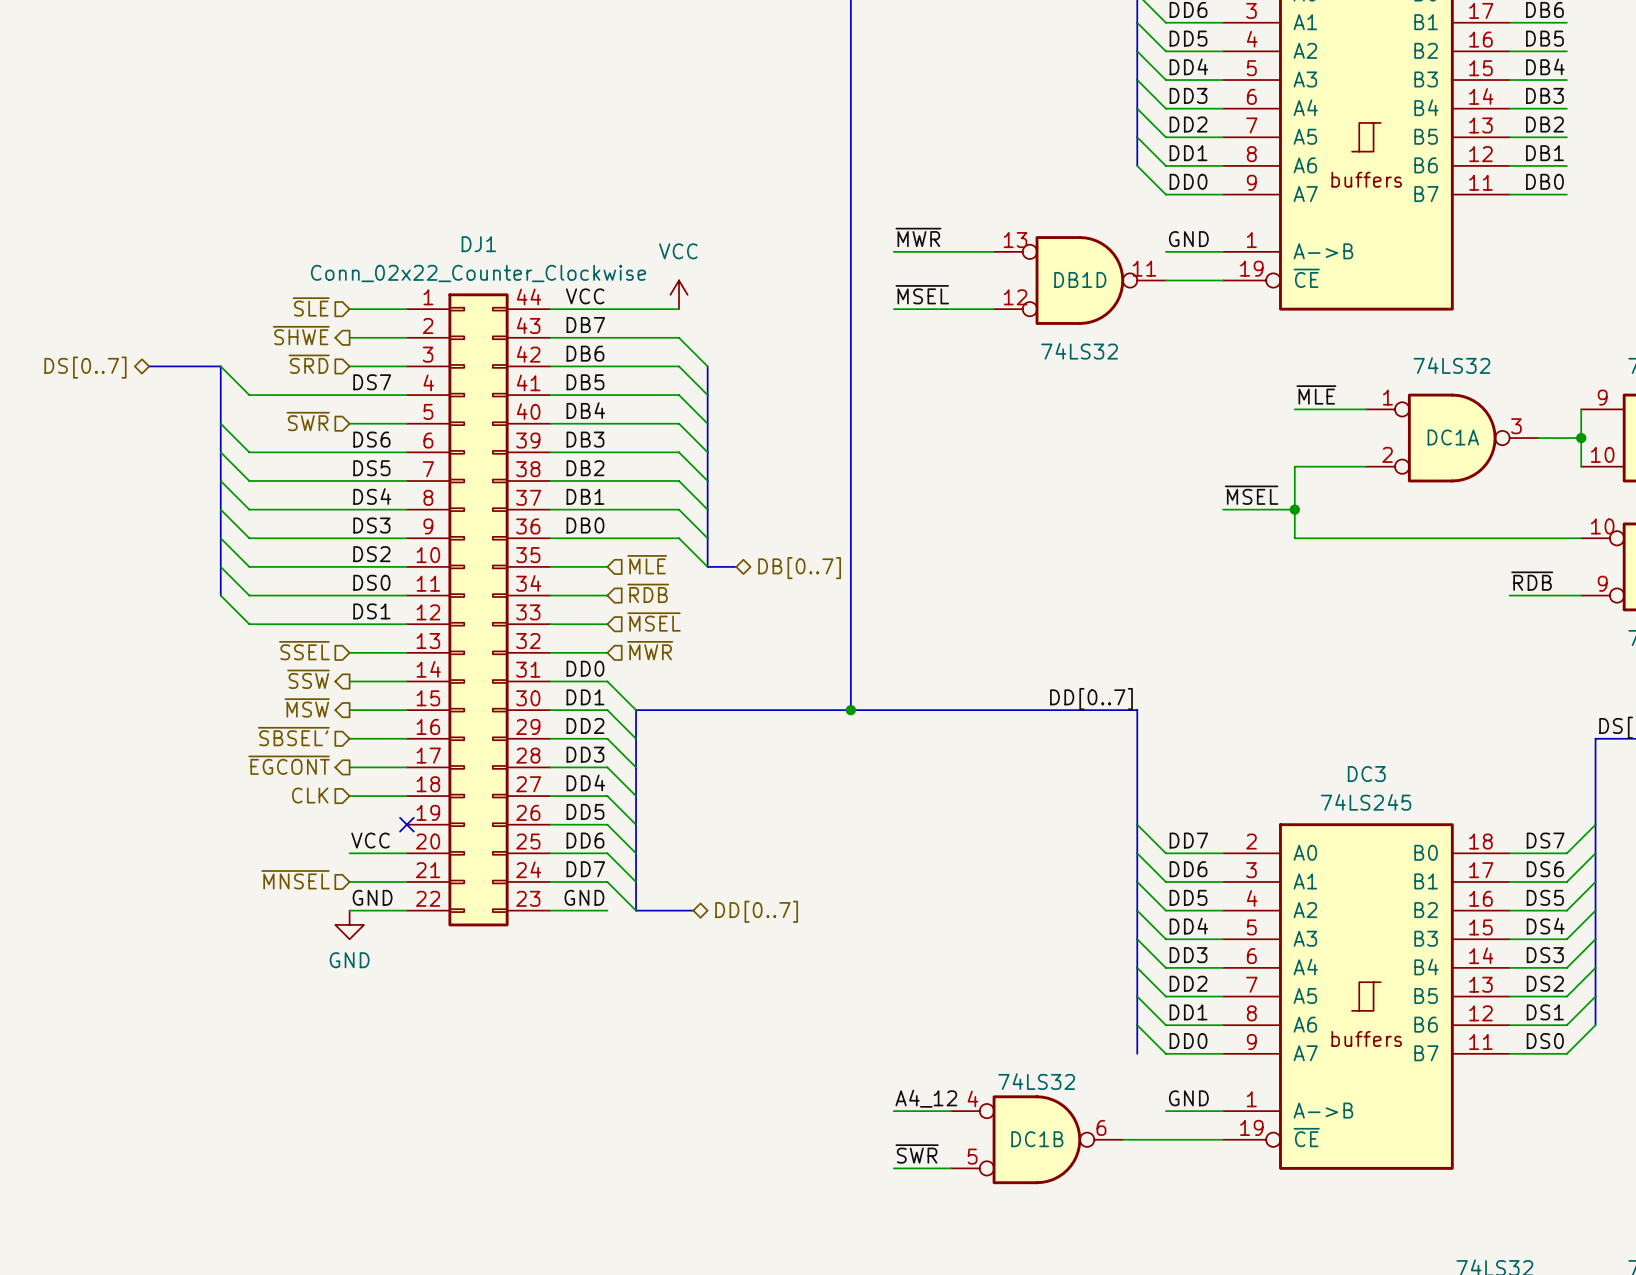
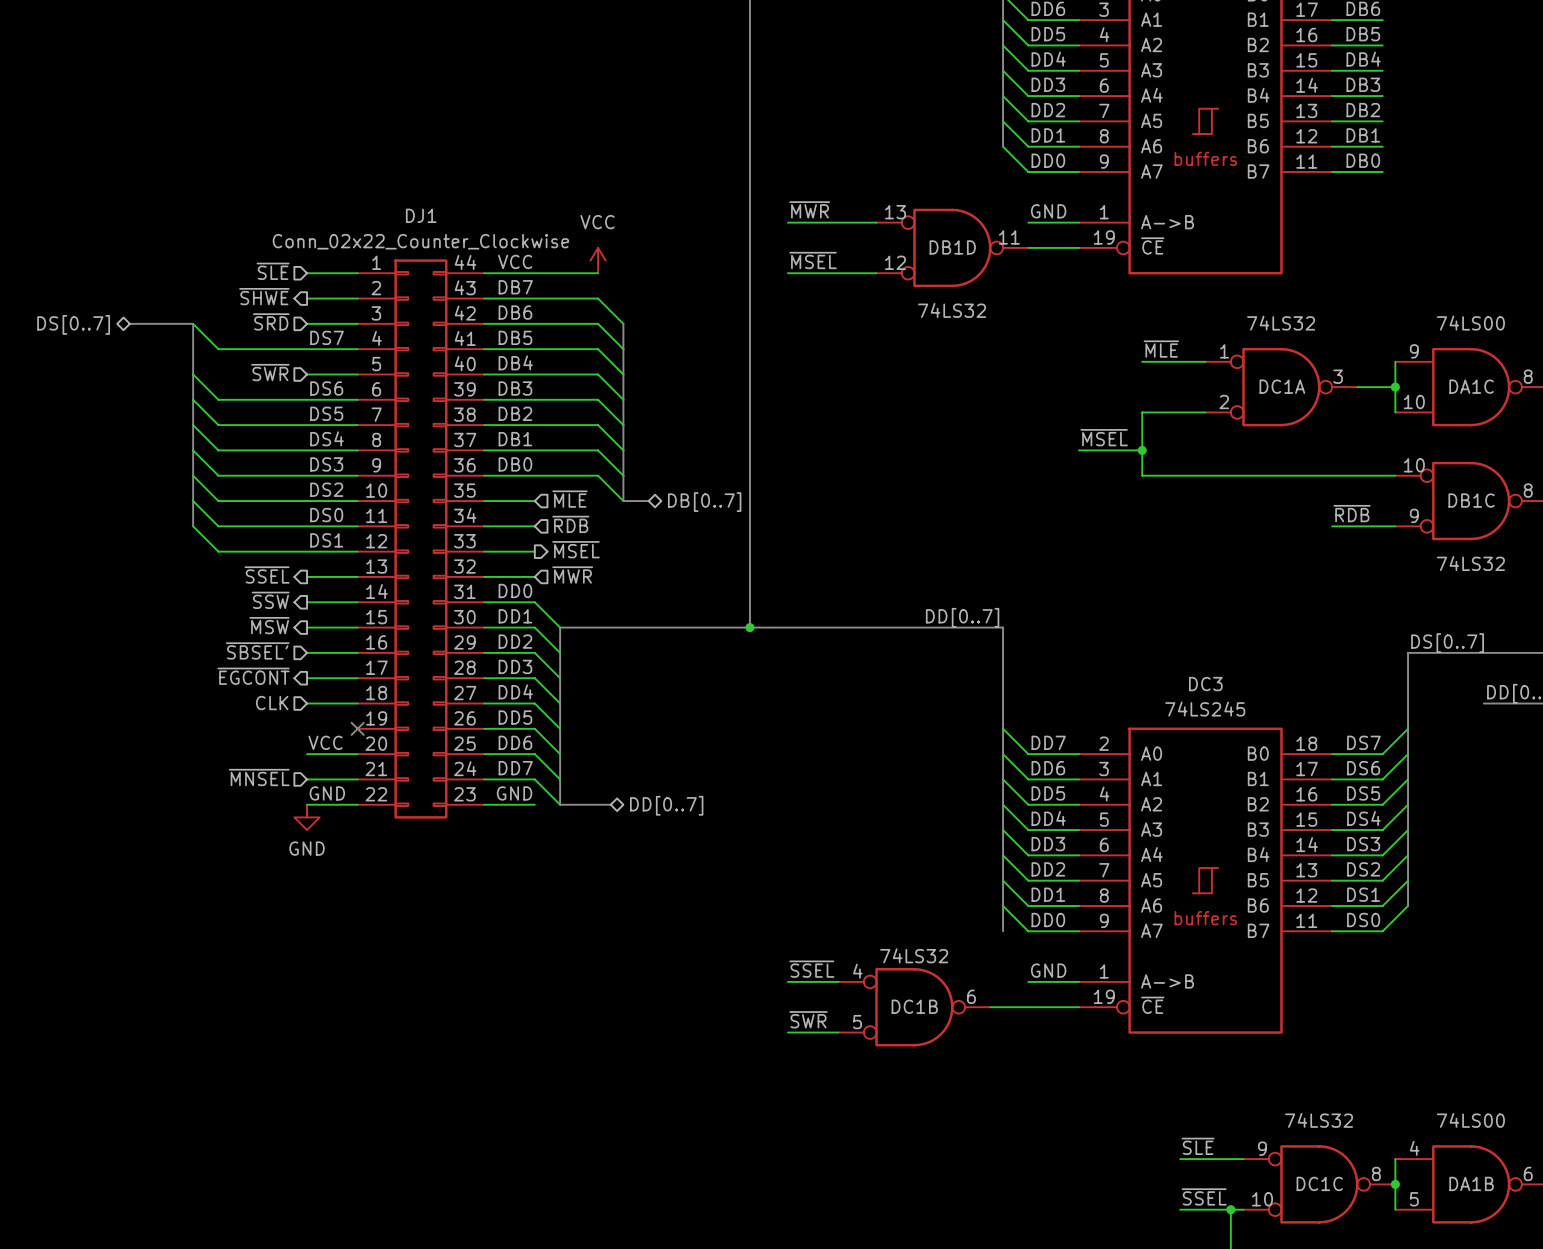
hierarchical label shape: input (654, 622) -> output (576, 549)
hierarchical label shape: input (304, 650) -> output (267, 575)
label: A4_12 (926, 1098) -> ~{SSEL} (811, 969)

